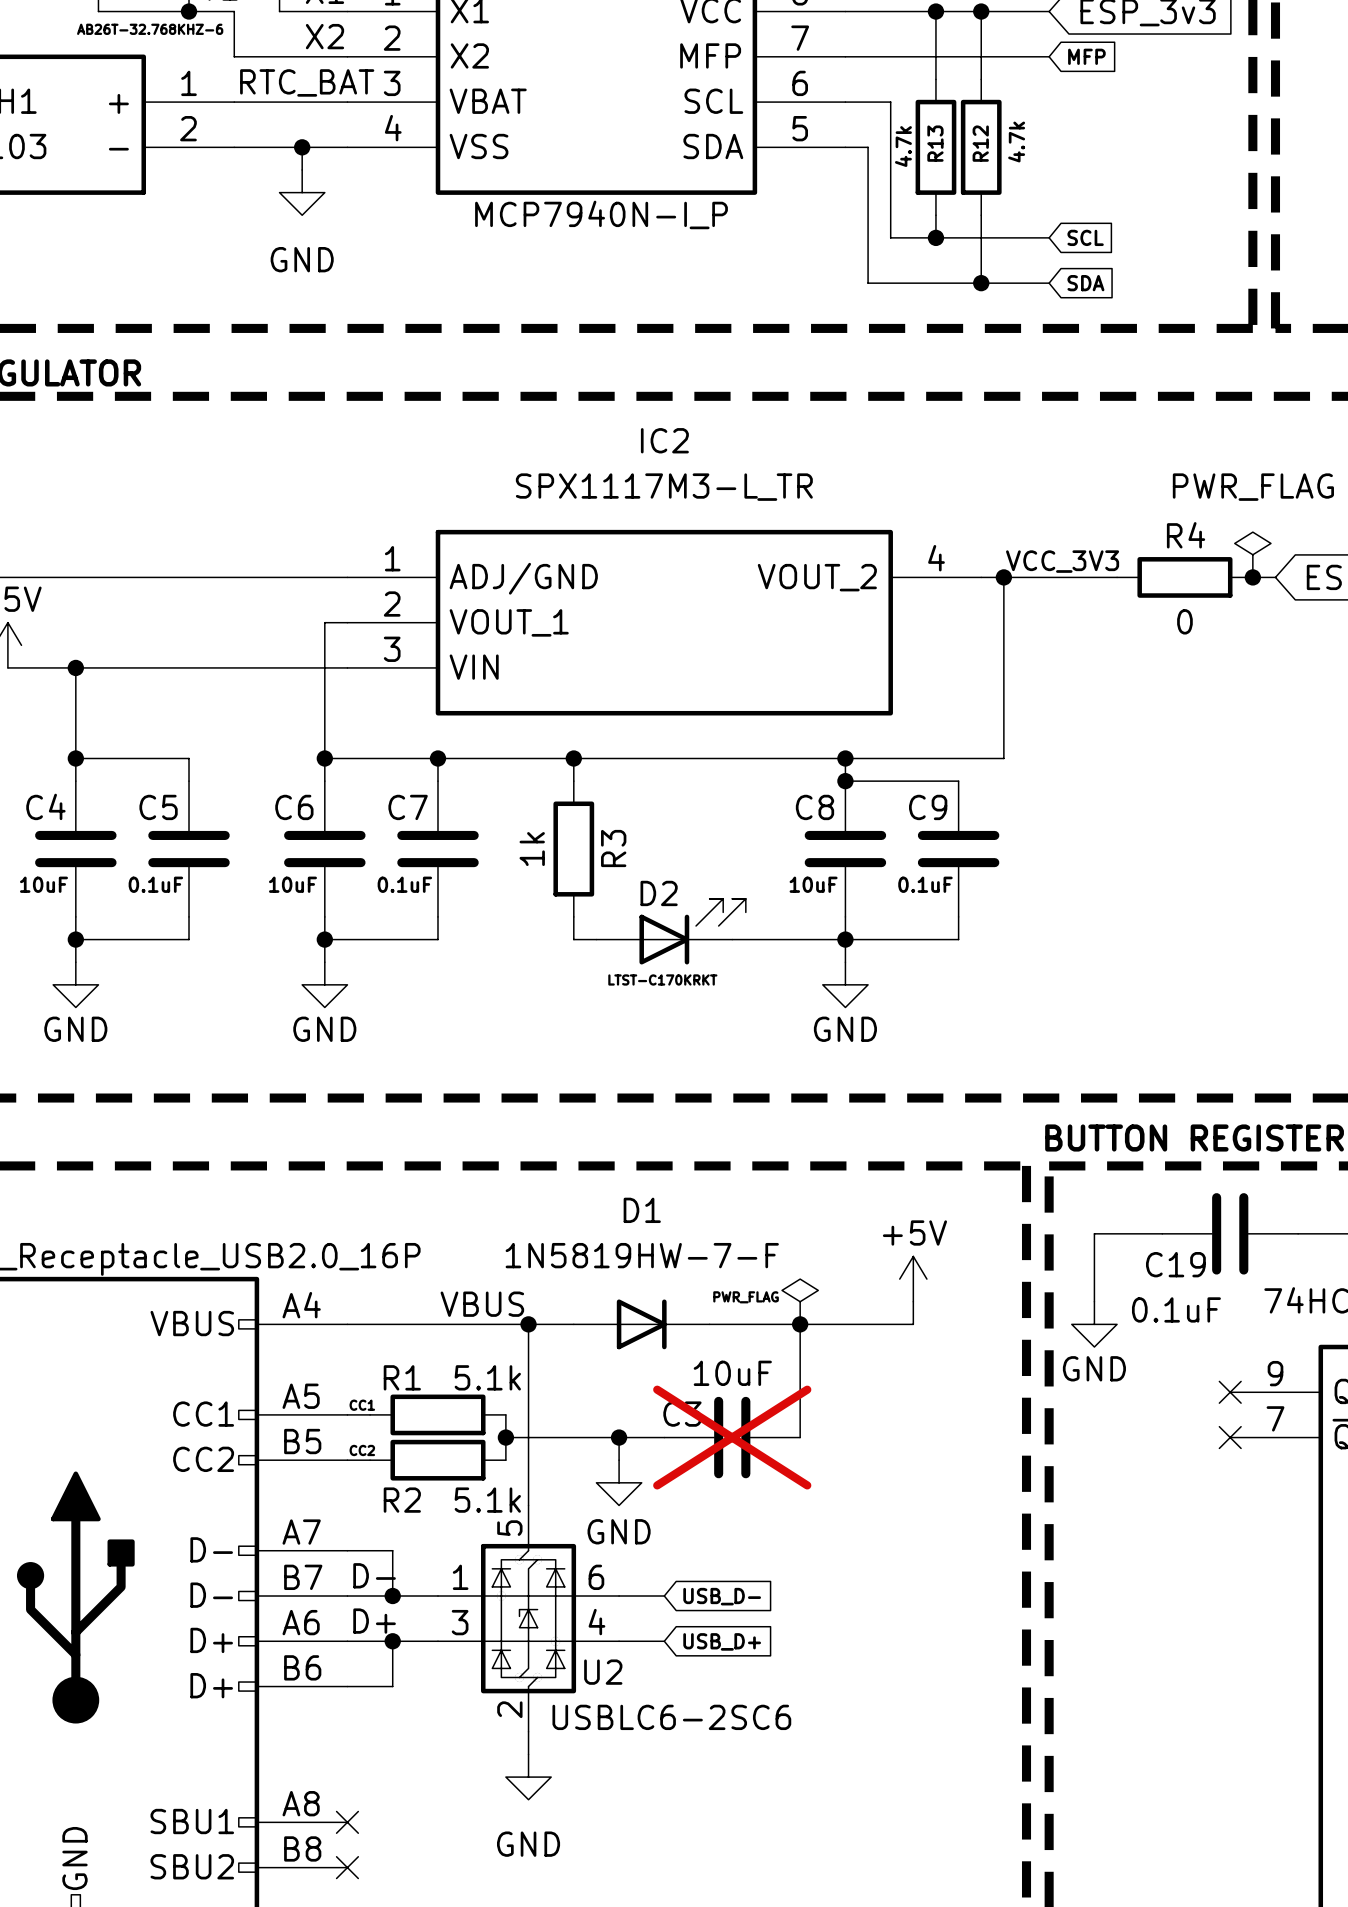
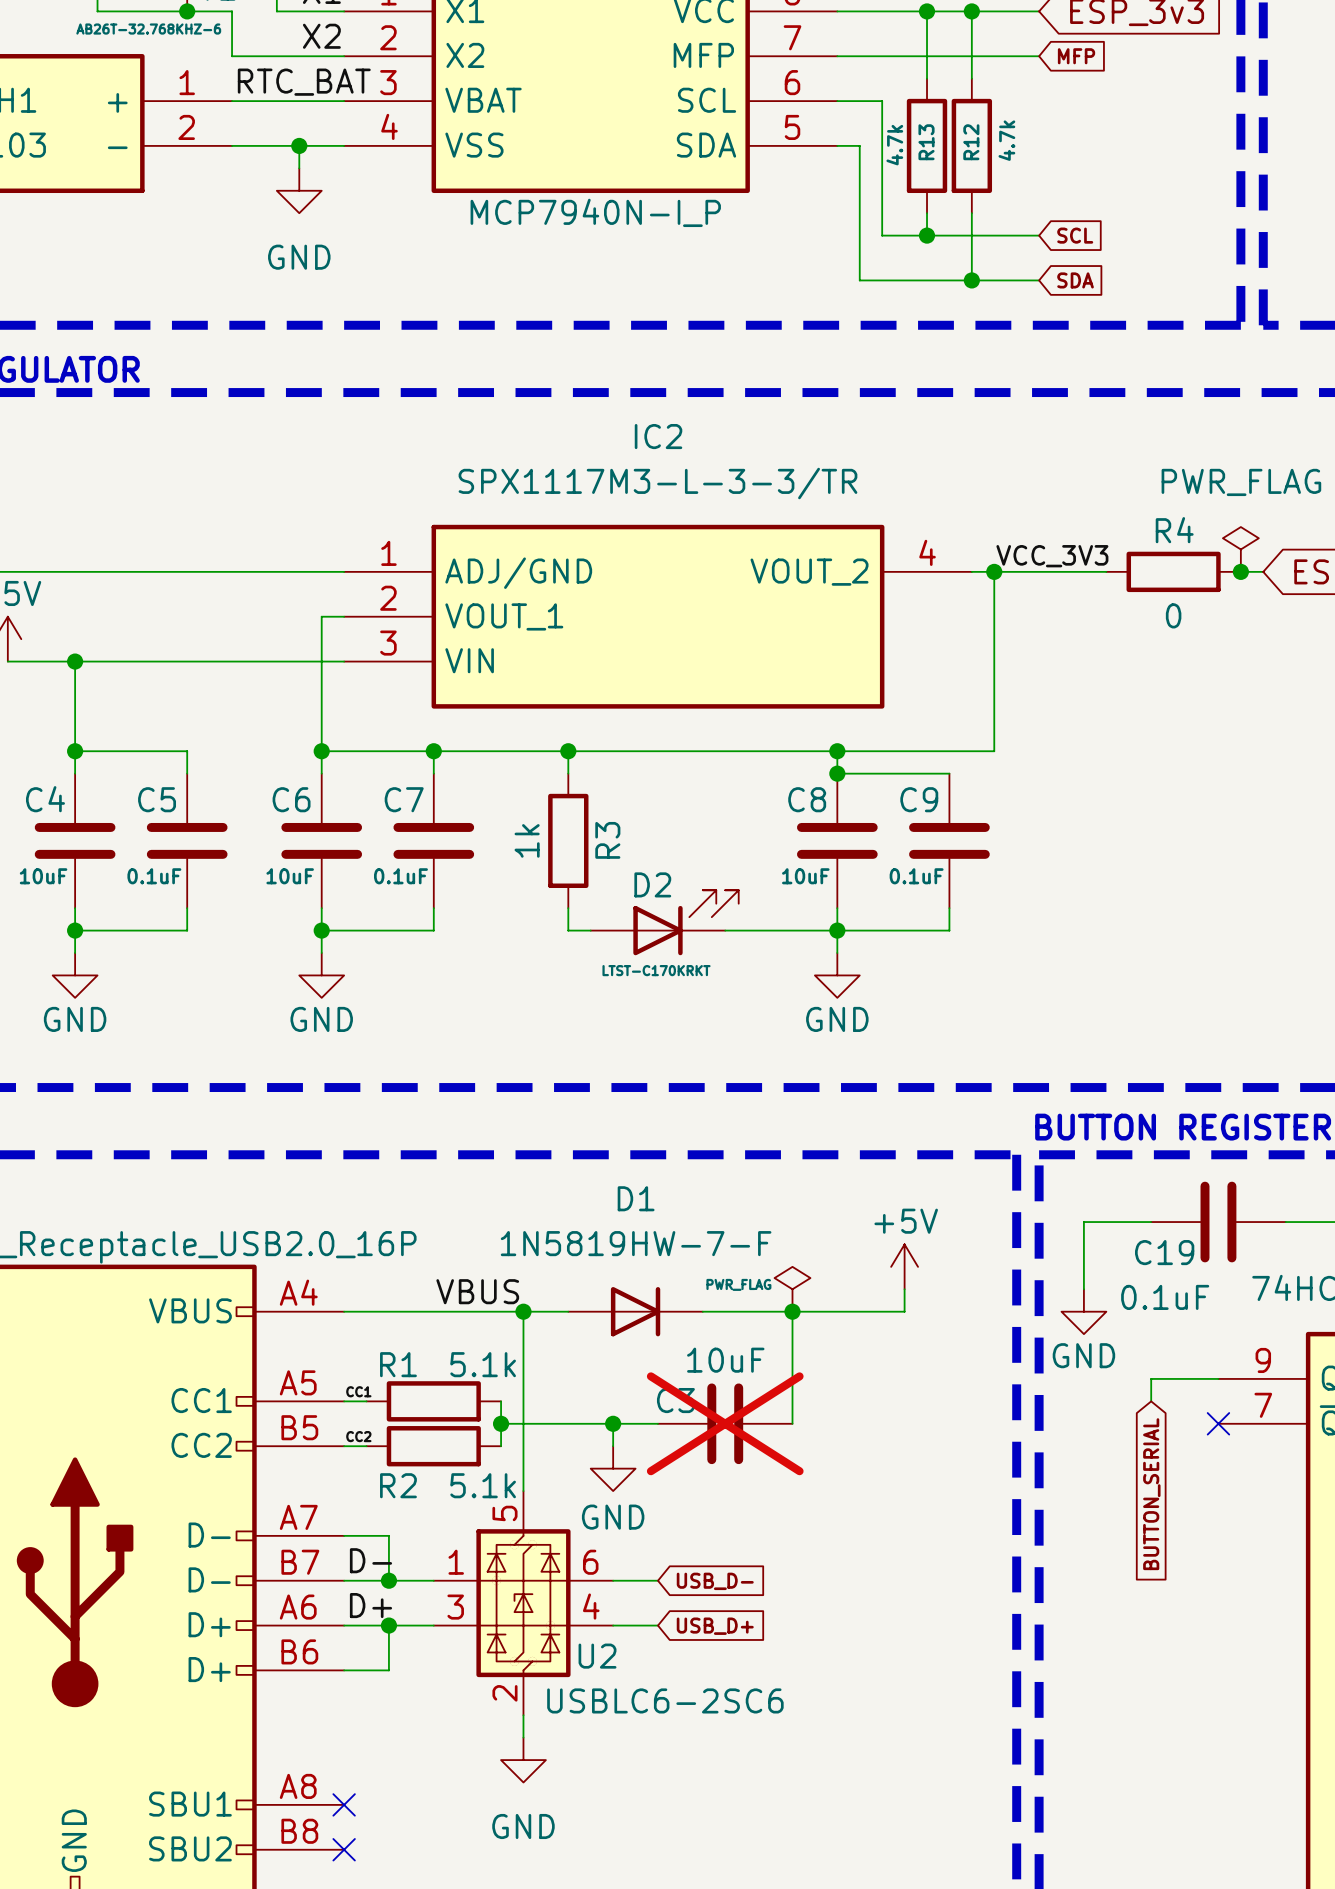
IC2 value: SPX1117M3-L_TR (664, 487) -> SPX1117M3-L-3-3/TR (657, 483)
wire: none -> (1218, 1378) (1151, 1378) (1151, 1401)
no-connect mark: (1230, 1392) -> none
global label: none -> BUTTON_SERIAL (1151, 1494)

